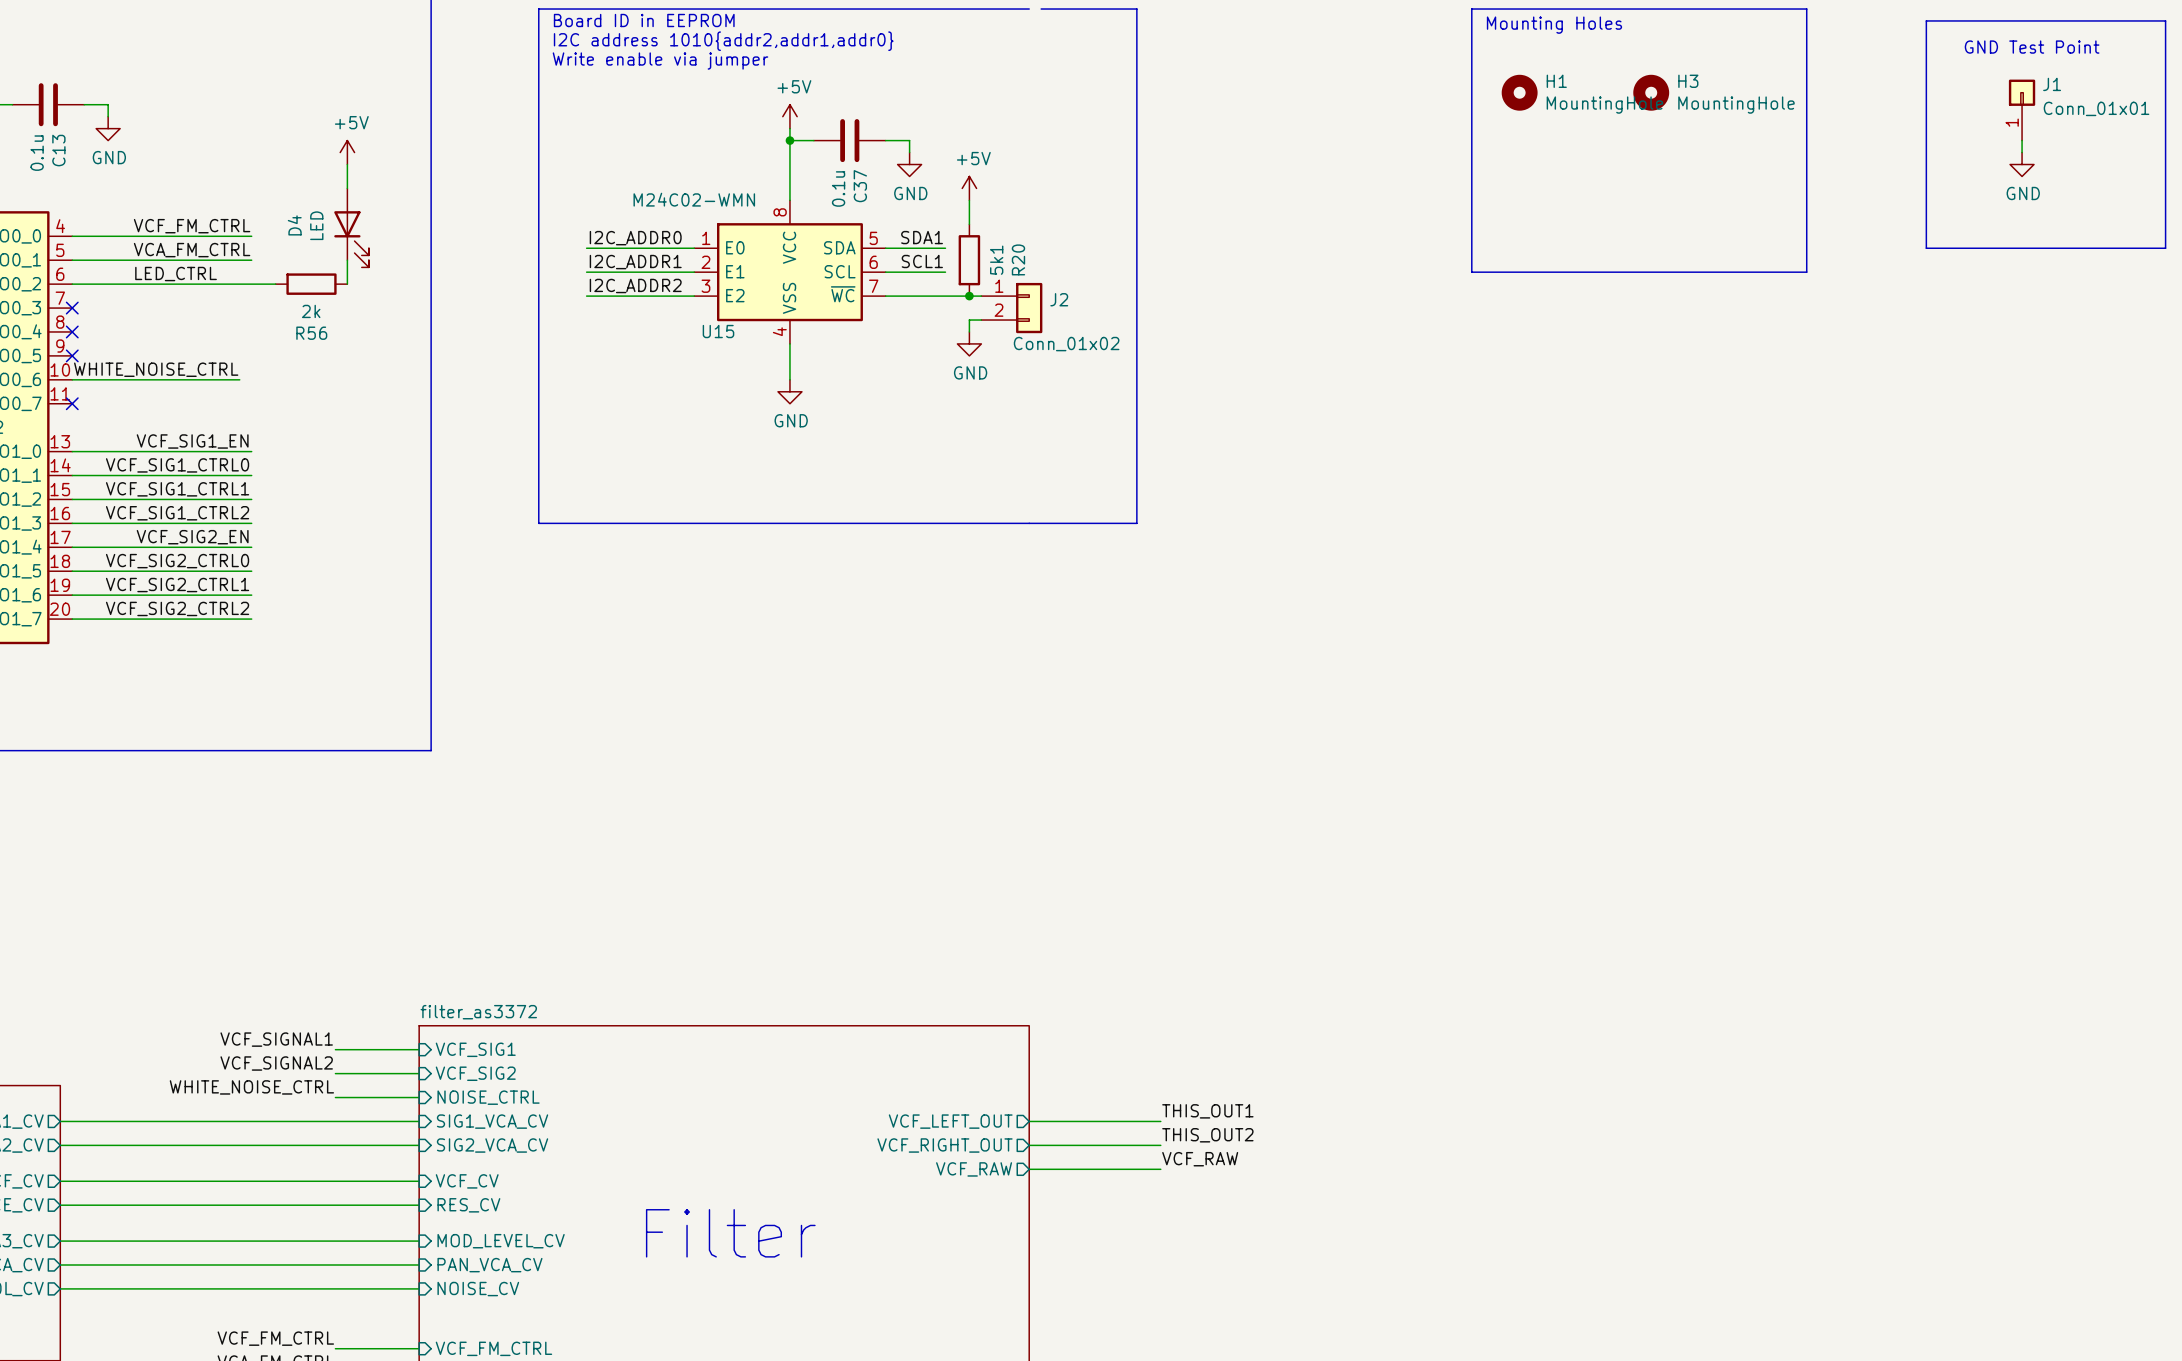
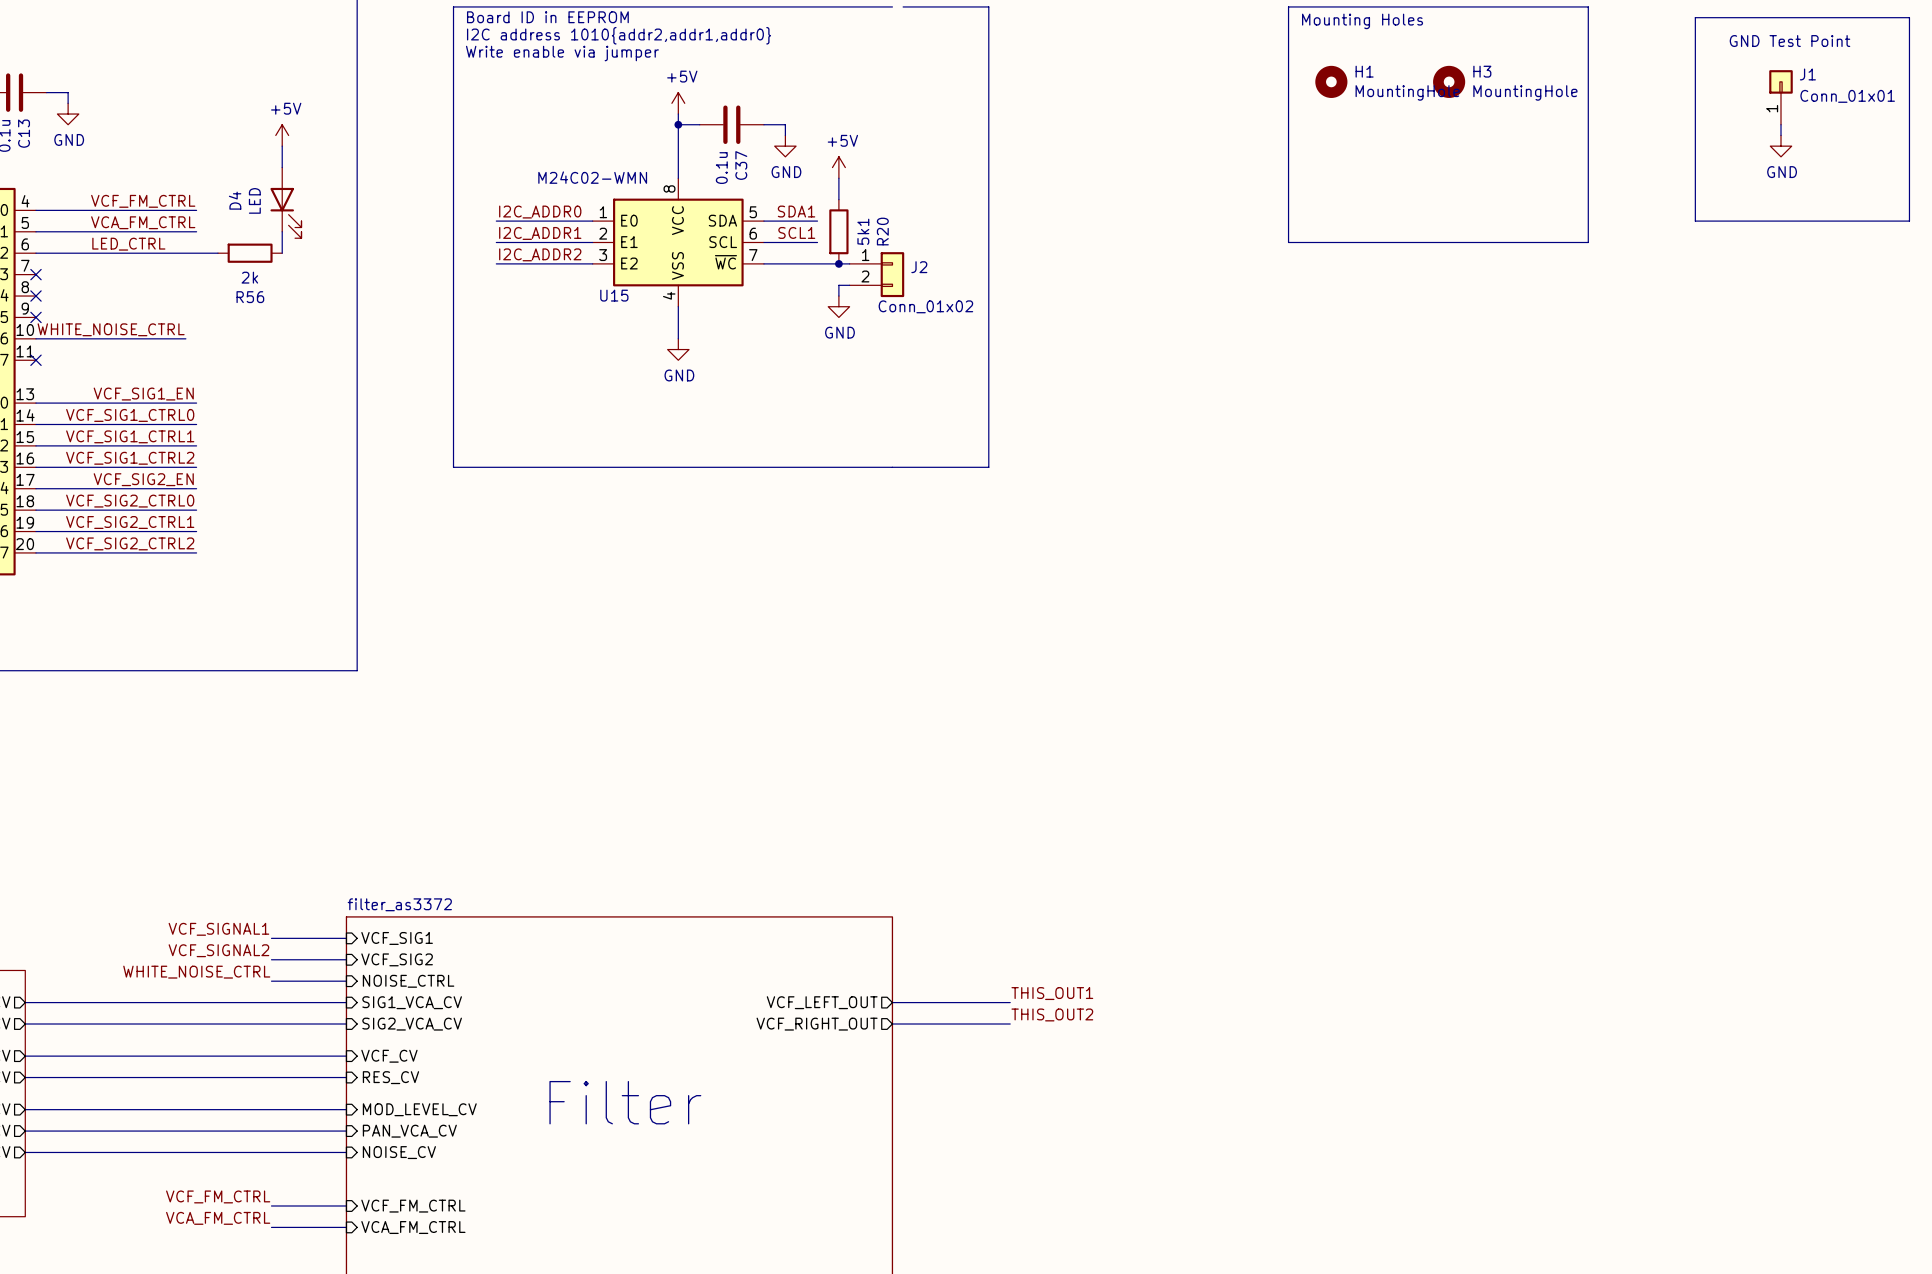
label: VCF_RAW (1200, 1159) -> none
sheet pin: VCF_RAW (974, 1169) -> none
wire: (1029, 1169) (1160, 1169) -> none

